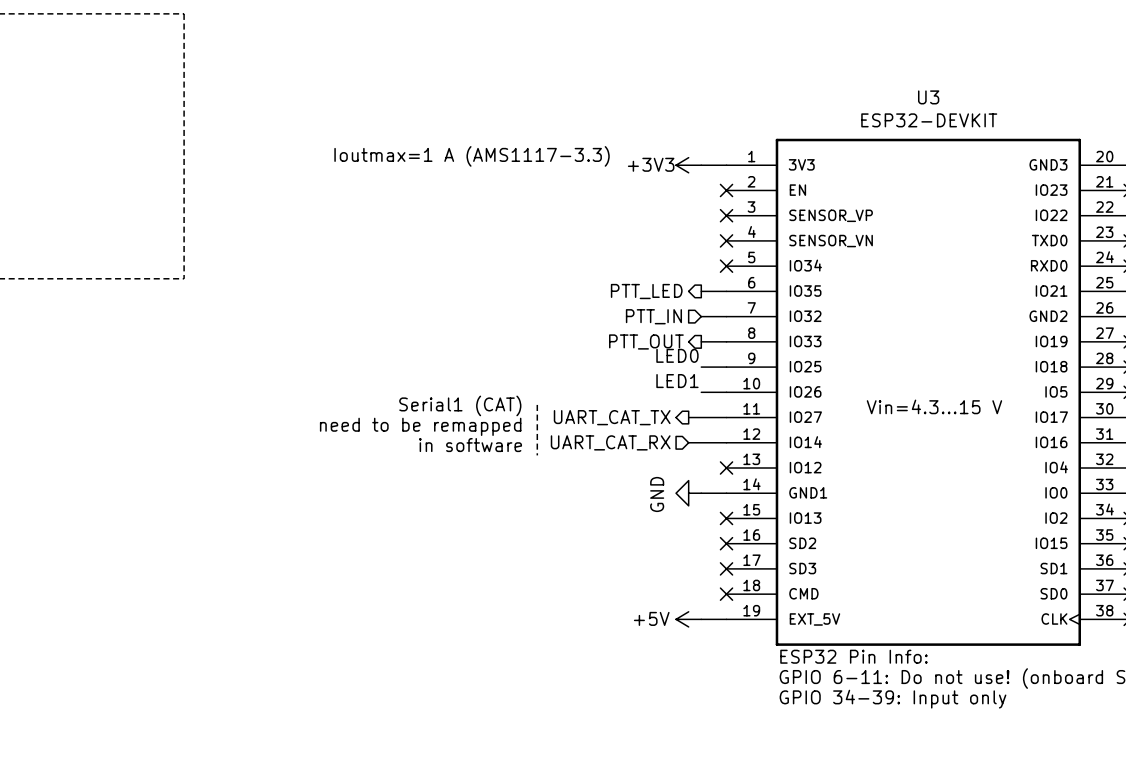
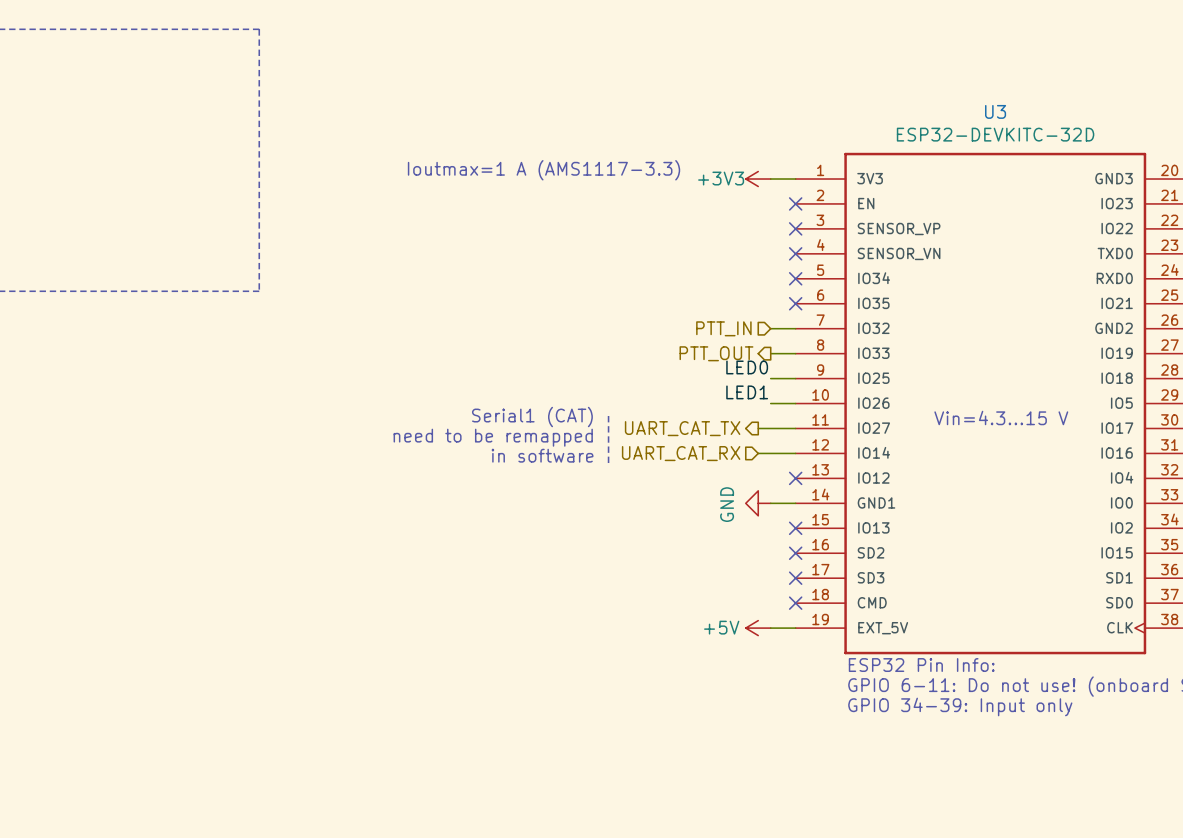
U3 value: ESP32-DEVKIT (929, 120) -> ESP32-DEVKITC-32D (995, 134)
hierarchical label: PTT_LED (646, 291) -> none
wire: (701, 291) (726, 291) -> none
no-connect mark: none -> (795, 303)

